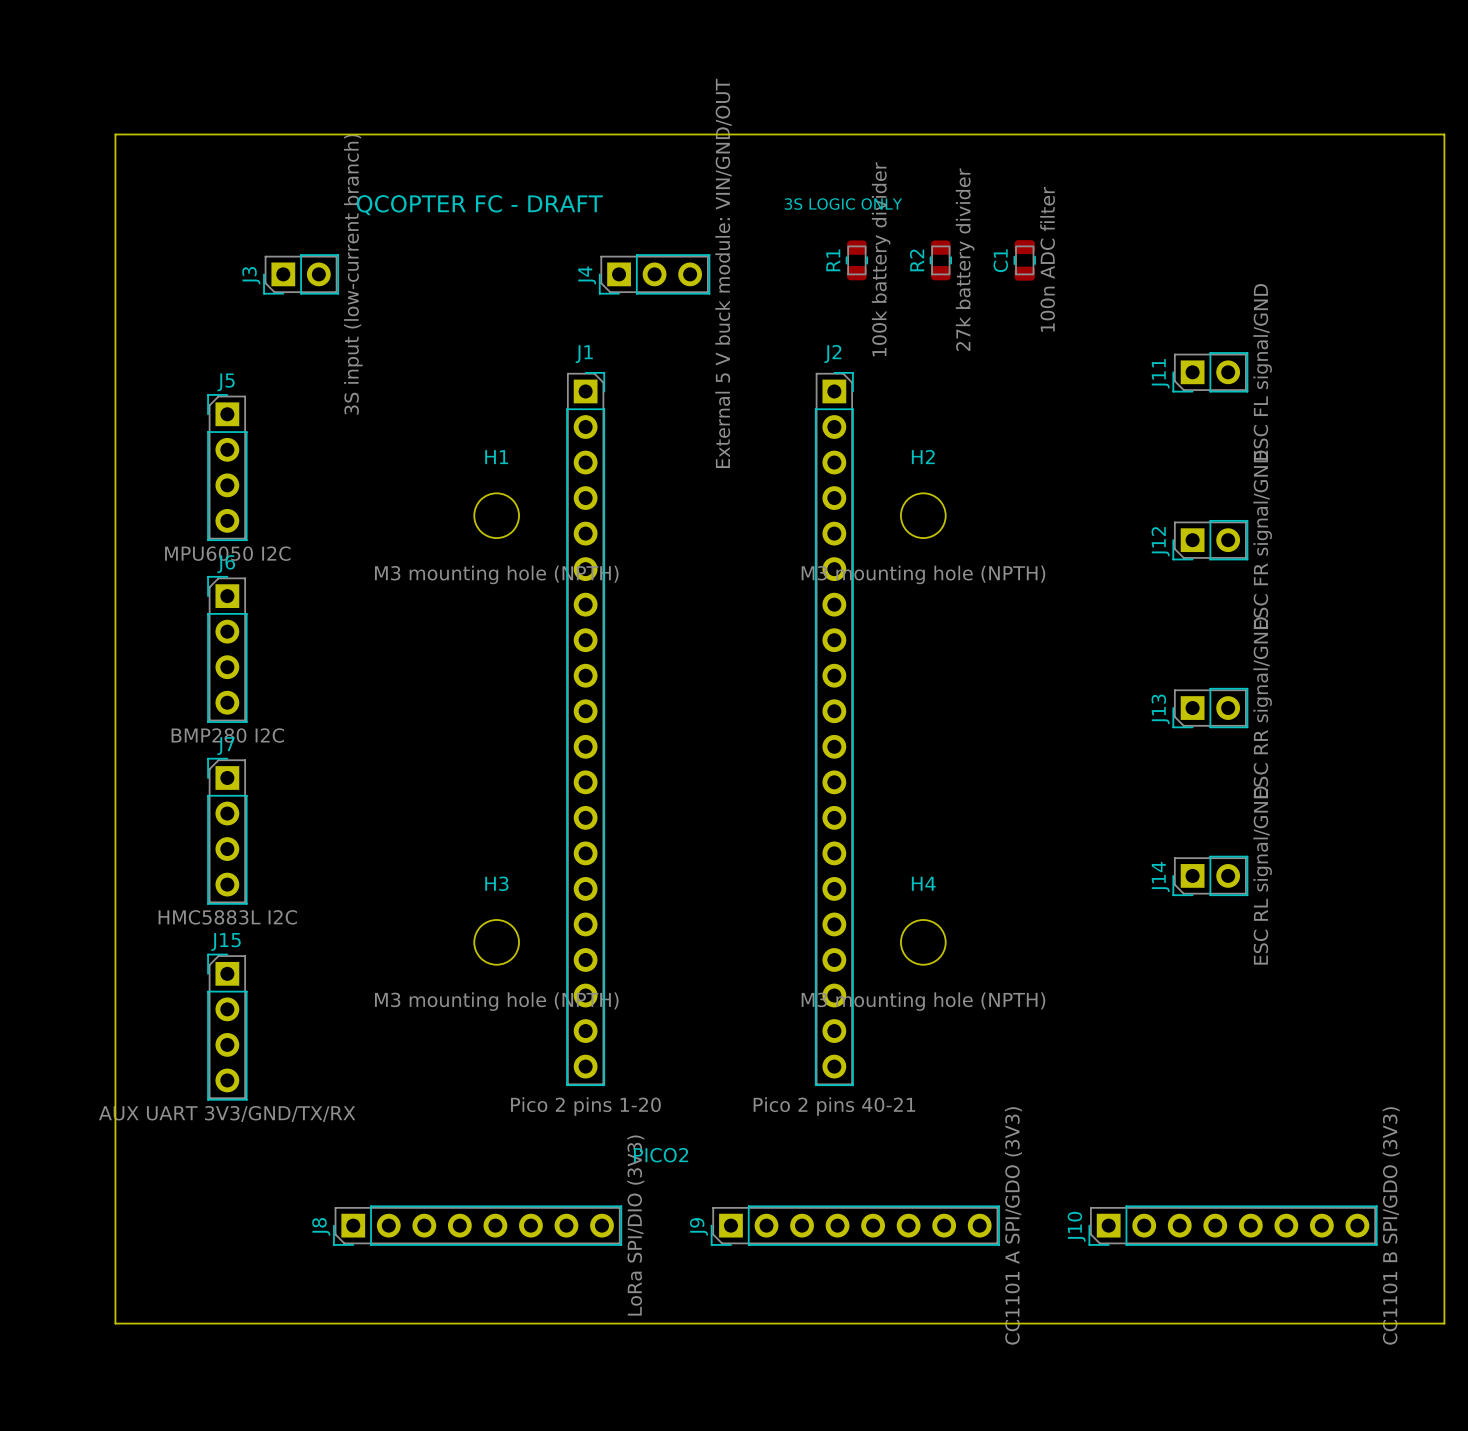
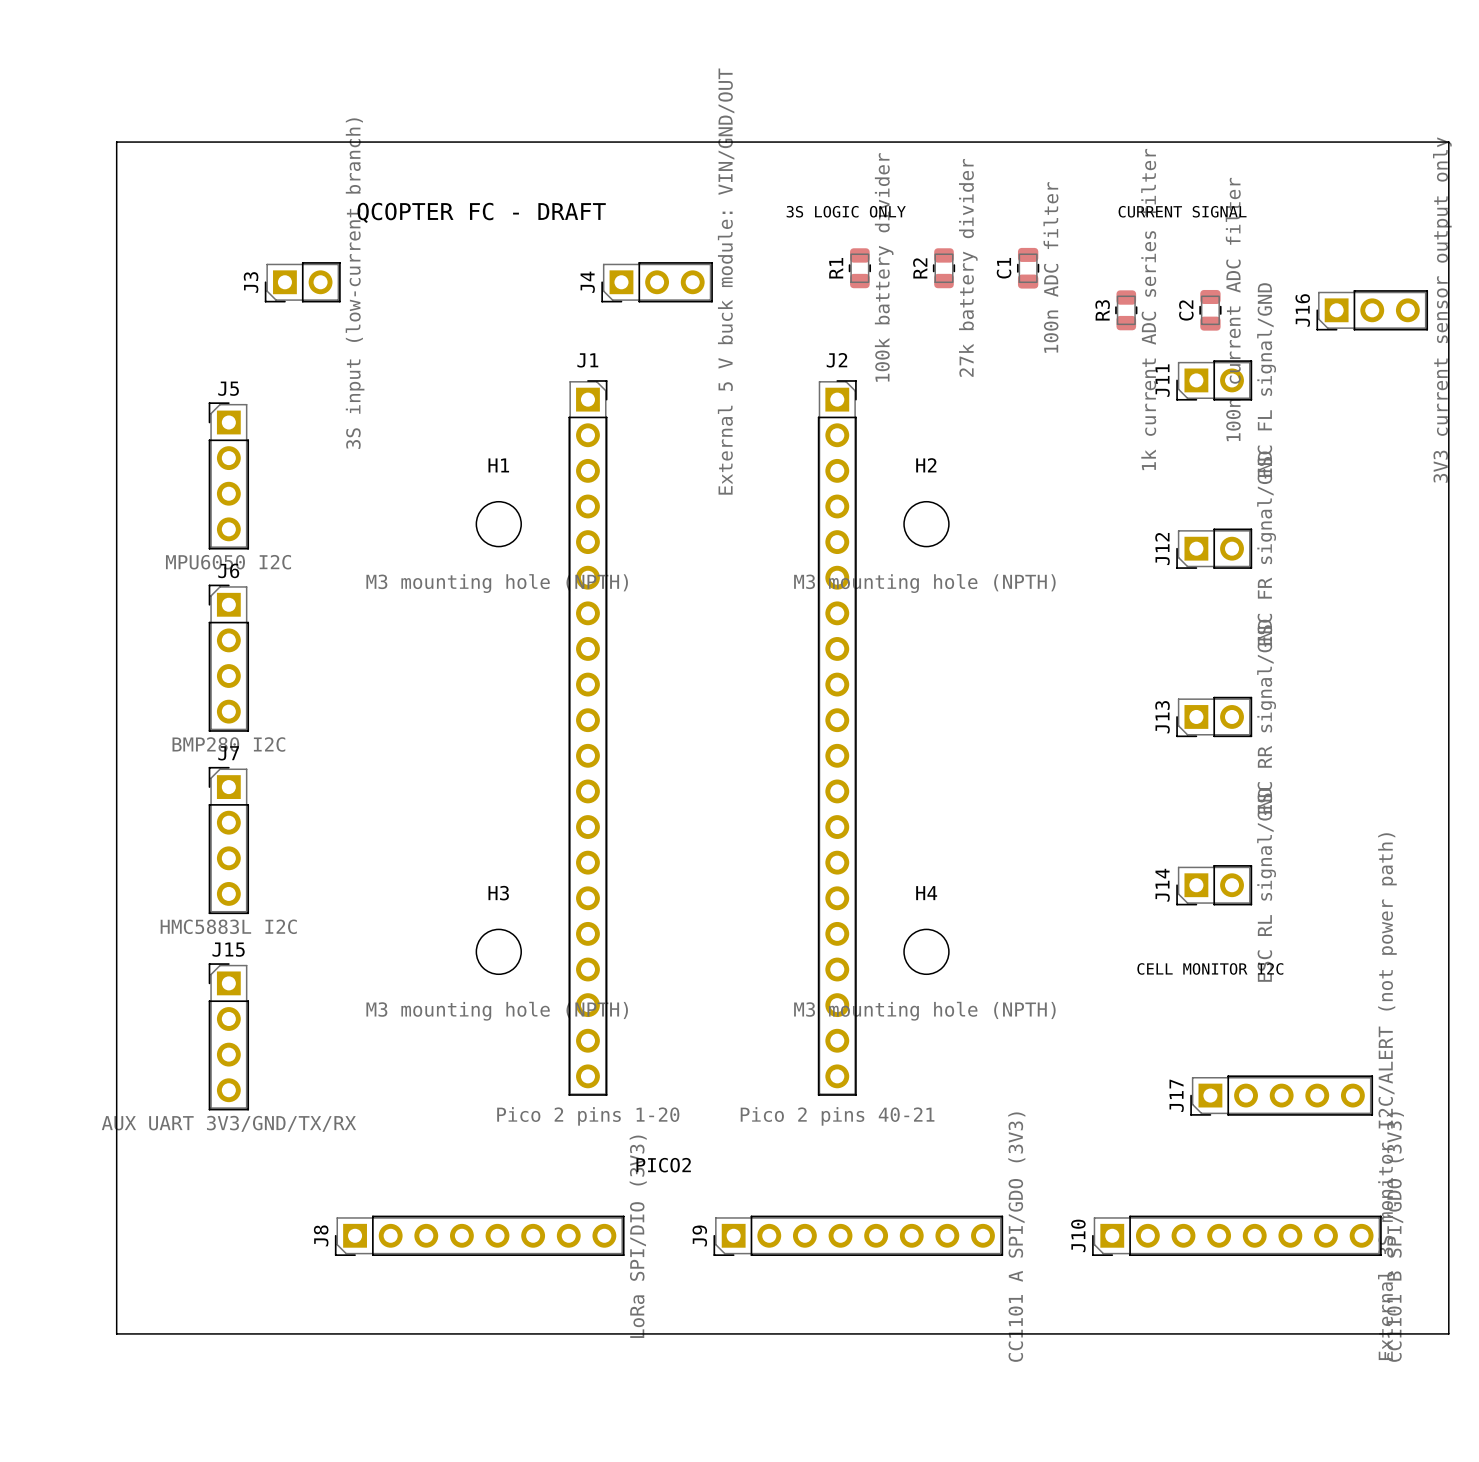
text: none -> CURRENT SIGNAL (1182, 211)
R3: none -> 1k current ADC series filter (1126, 310)
C2: none -> 100n current ADC filter (1210, 310)
J16: none -> 3V3 current sensor output only (1372, 310)
text: none -> CELL MONITOR I2C (1210, 968)
J17: none -> External 3S monitor I2C/ALERT (not power path) (1281, 1095)

